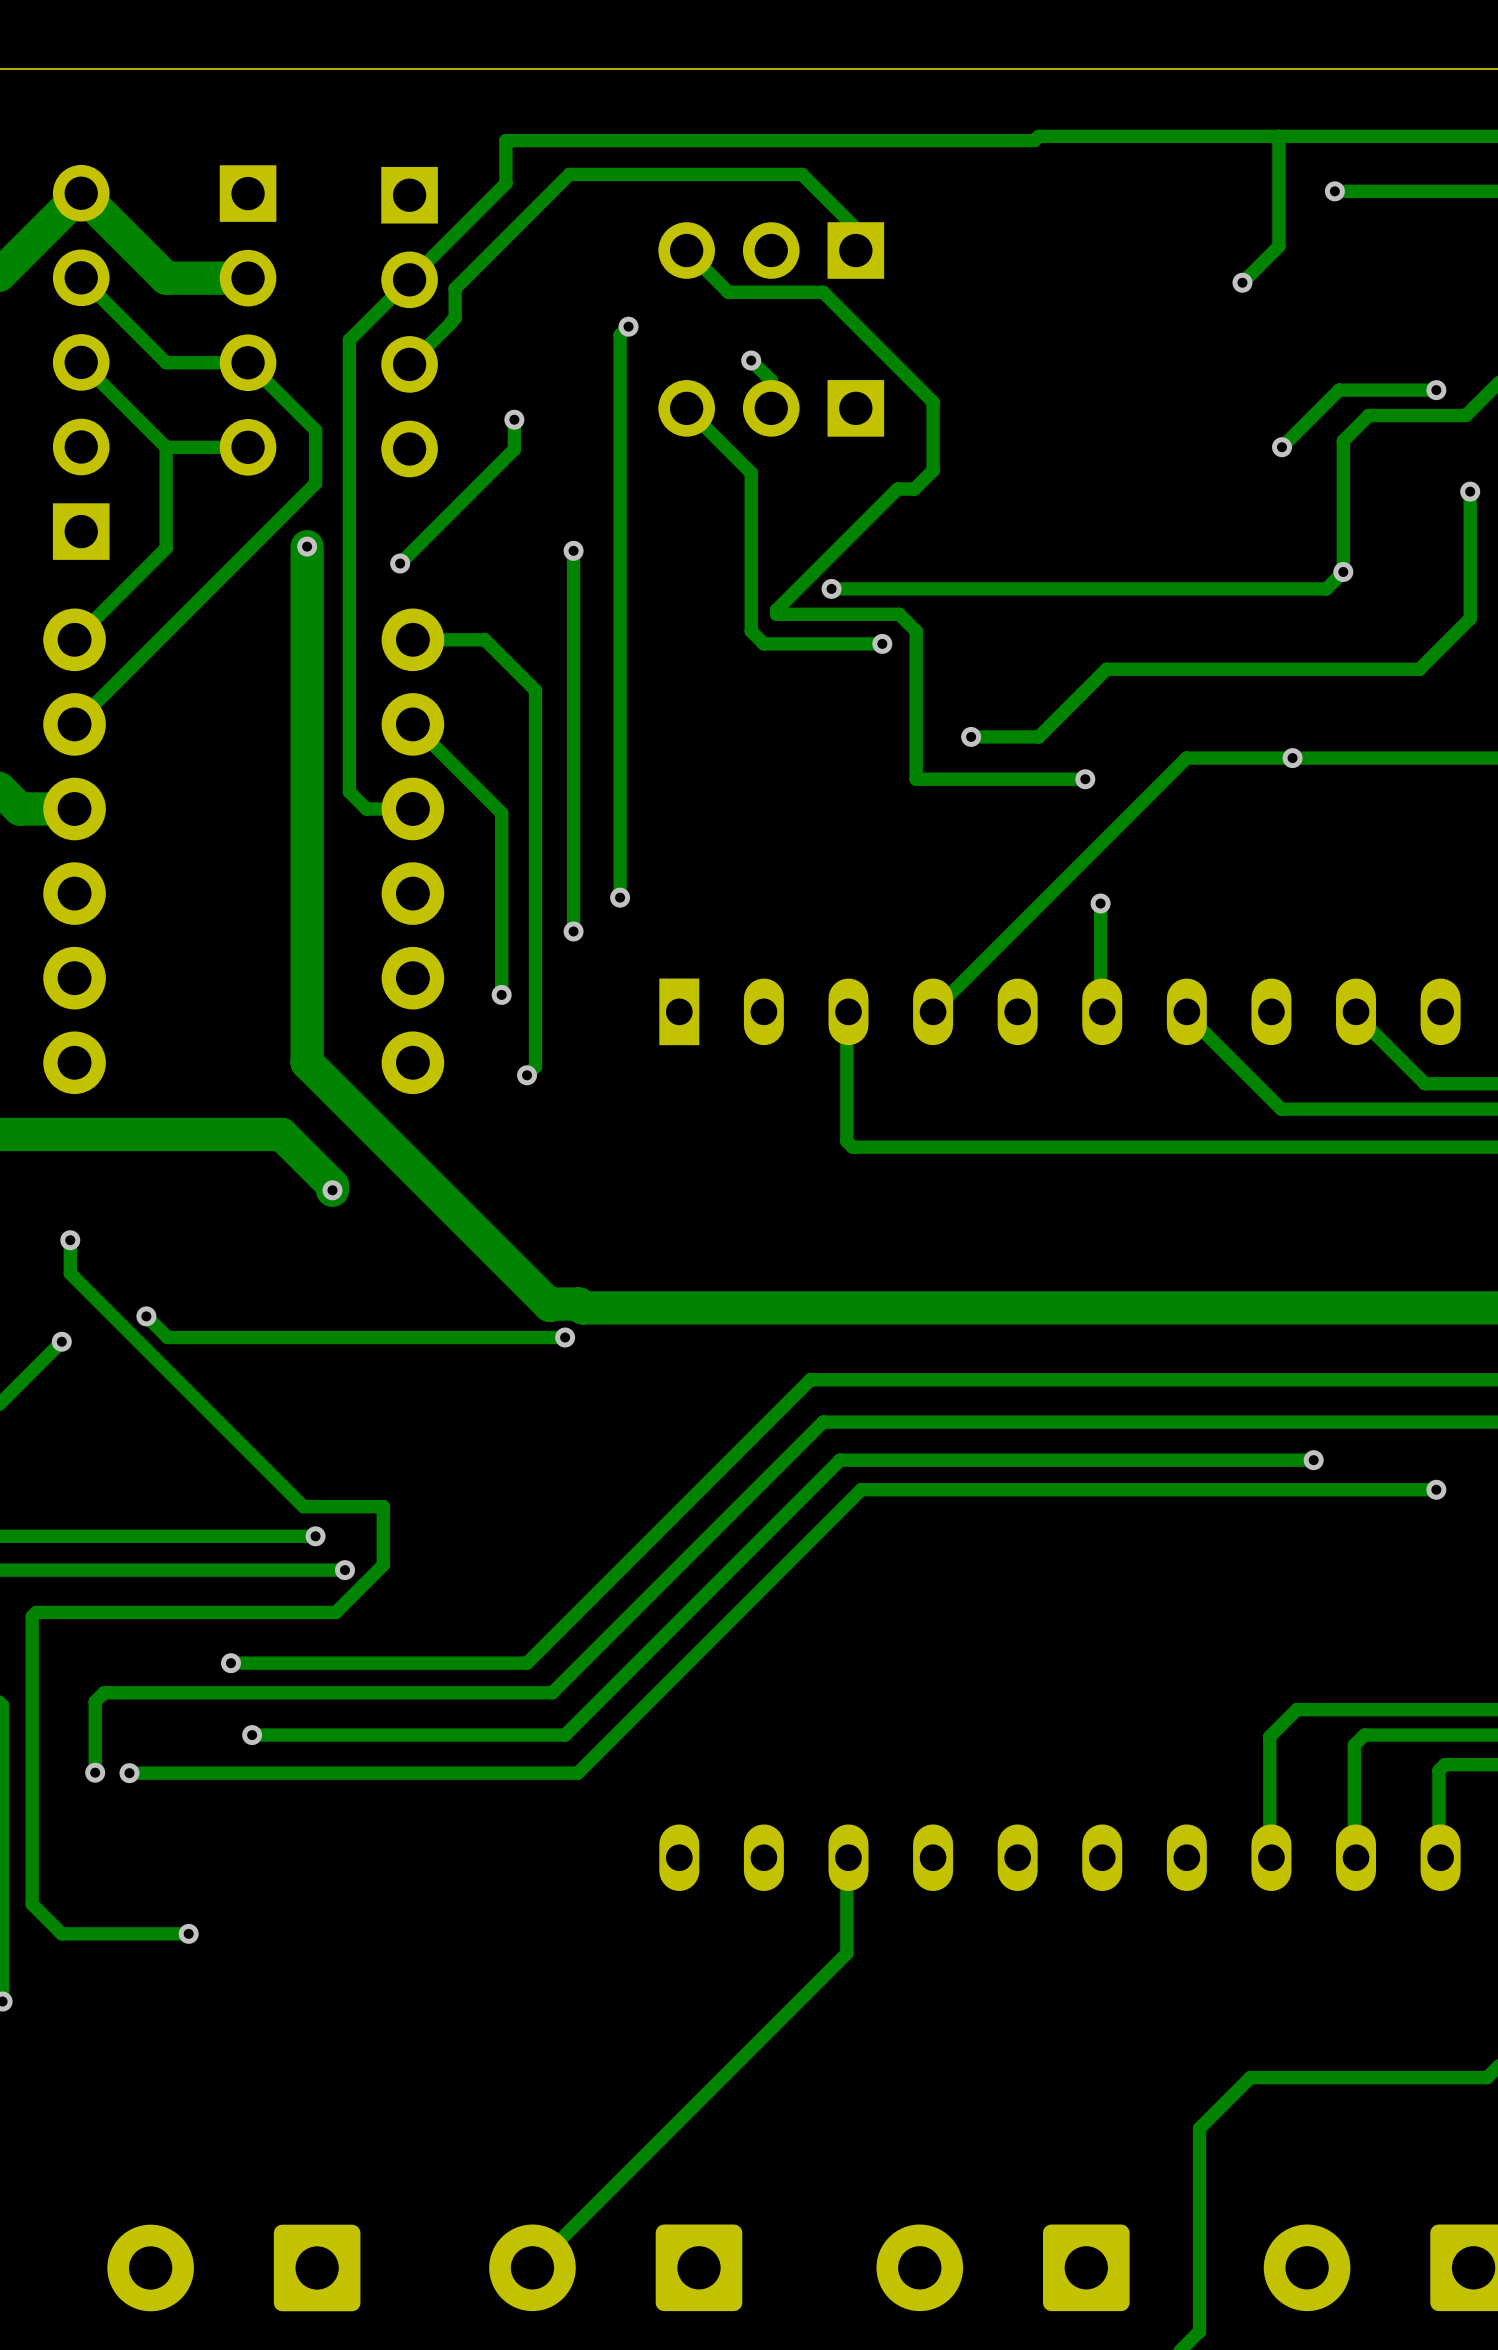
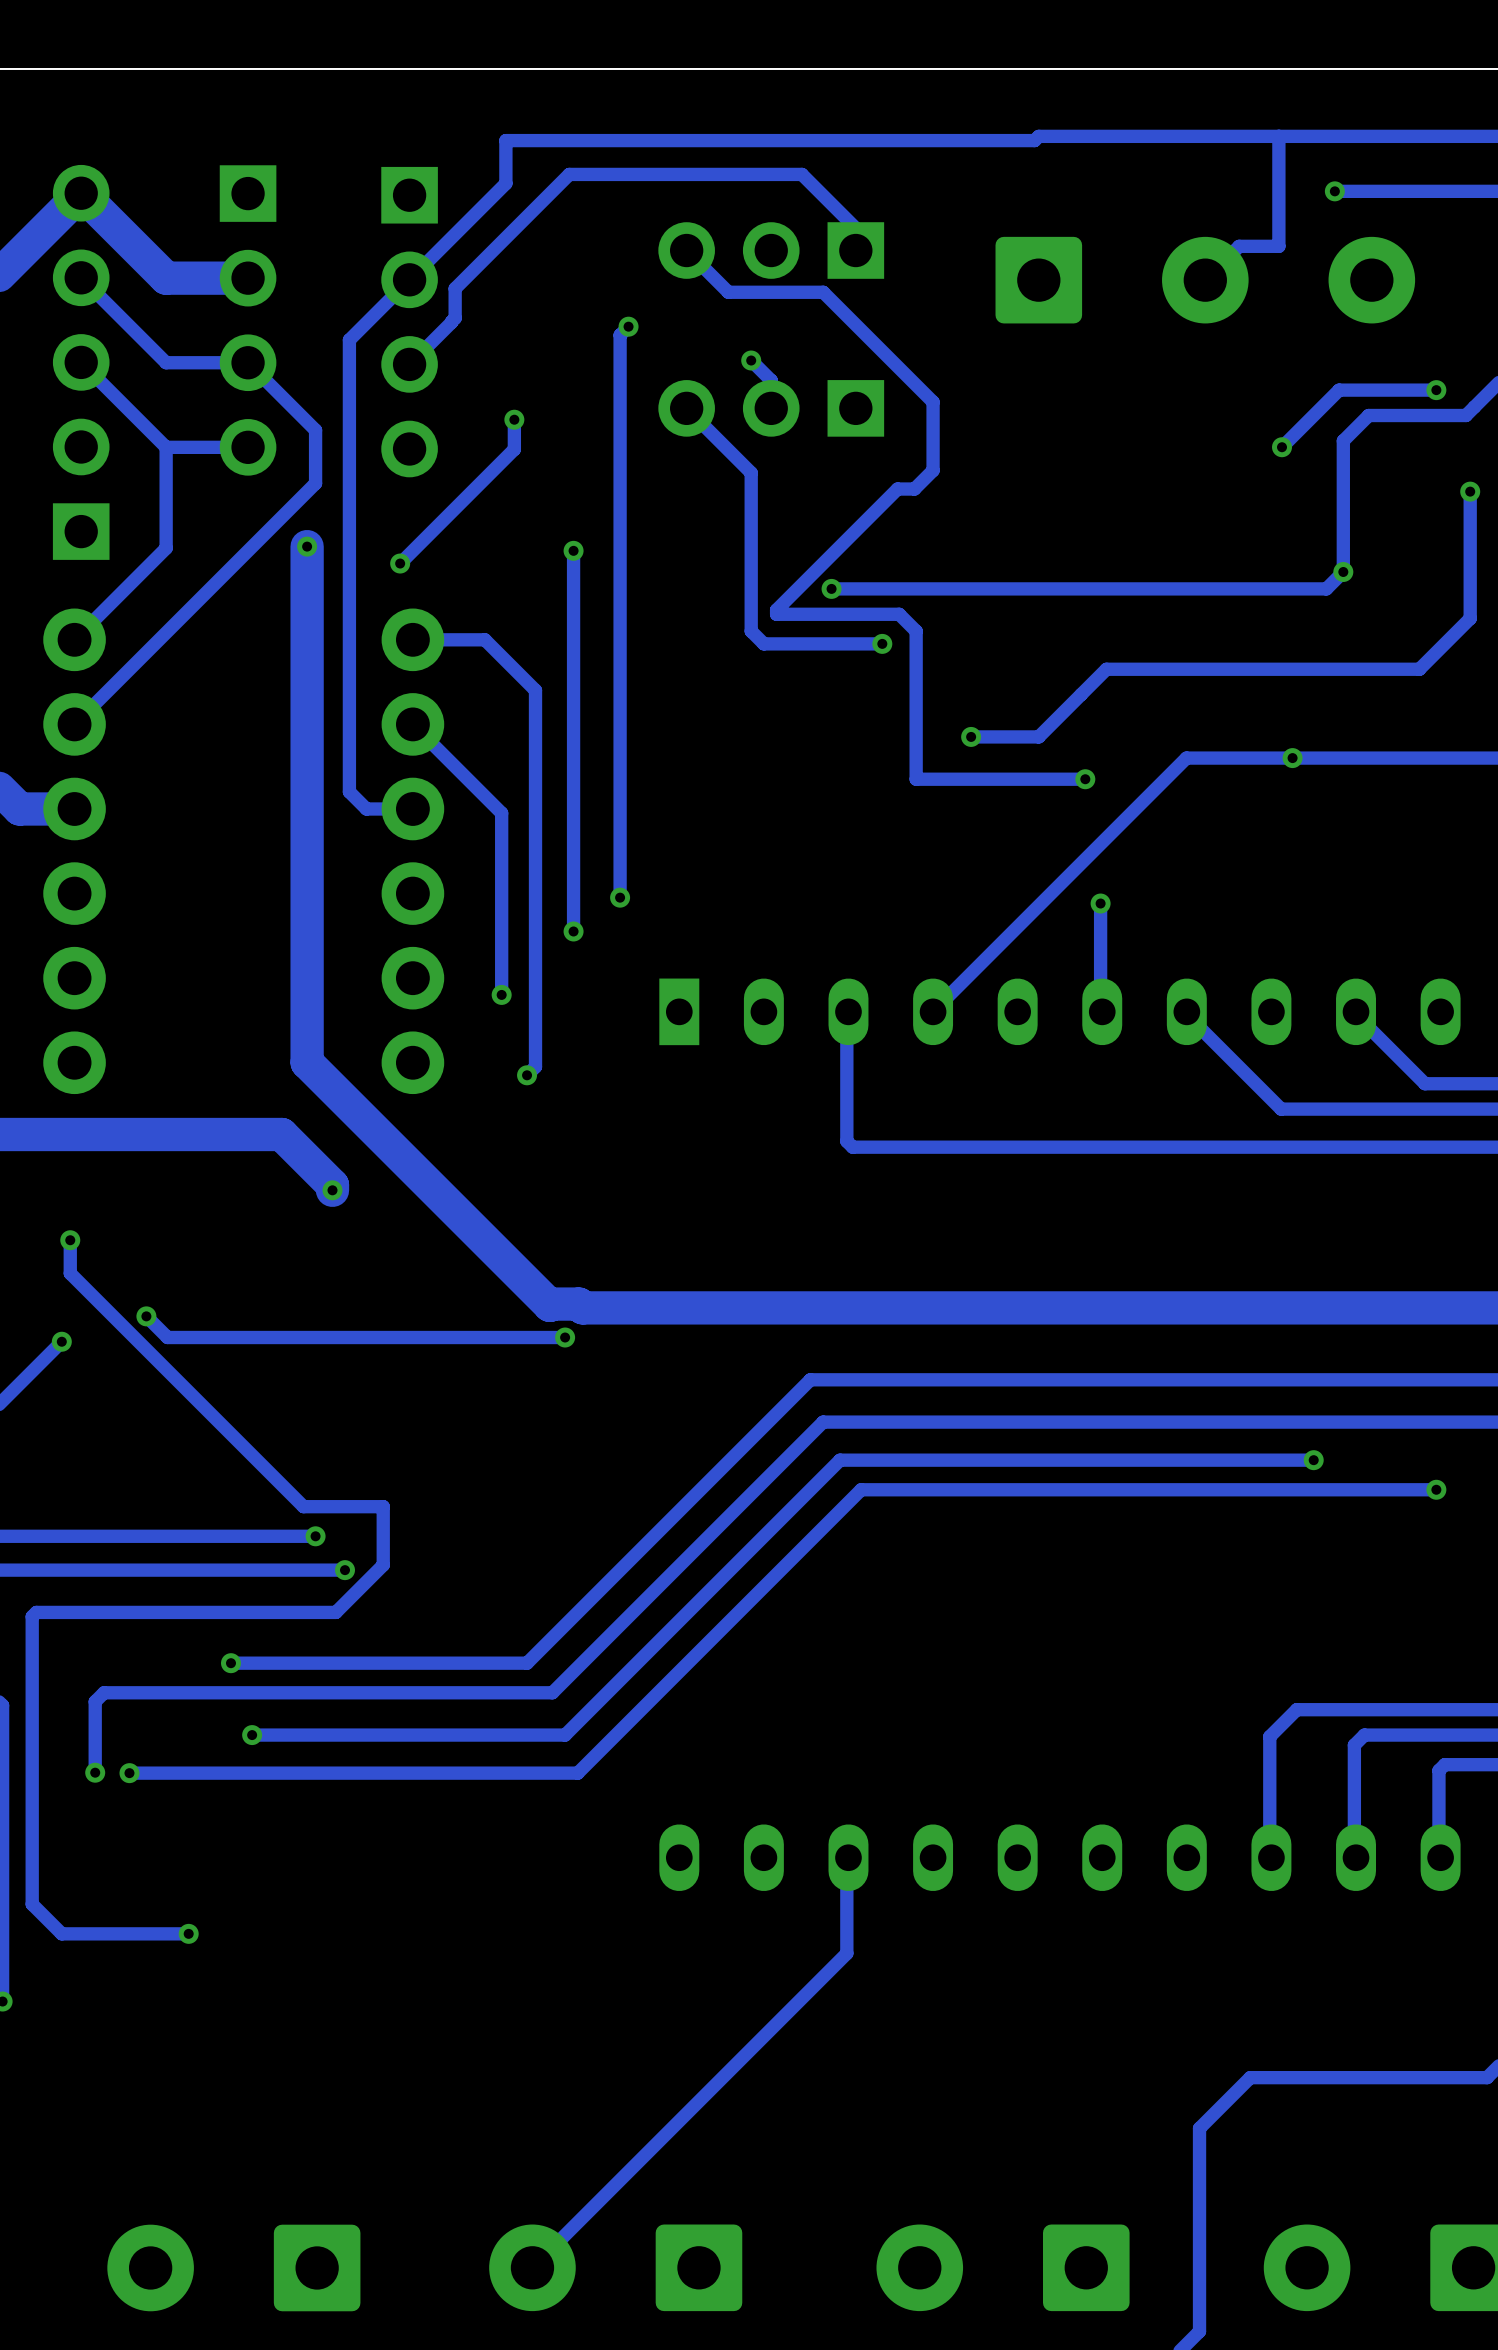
track: (1278, 246) (1242, 282) -> (1278, 246) (1239, 246) (1205, 280)
part: none -> (1205, 280)
via: (1242, 282) -> none

